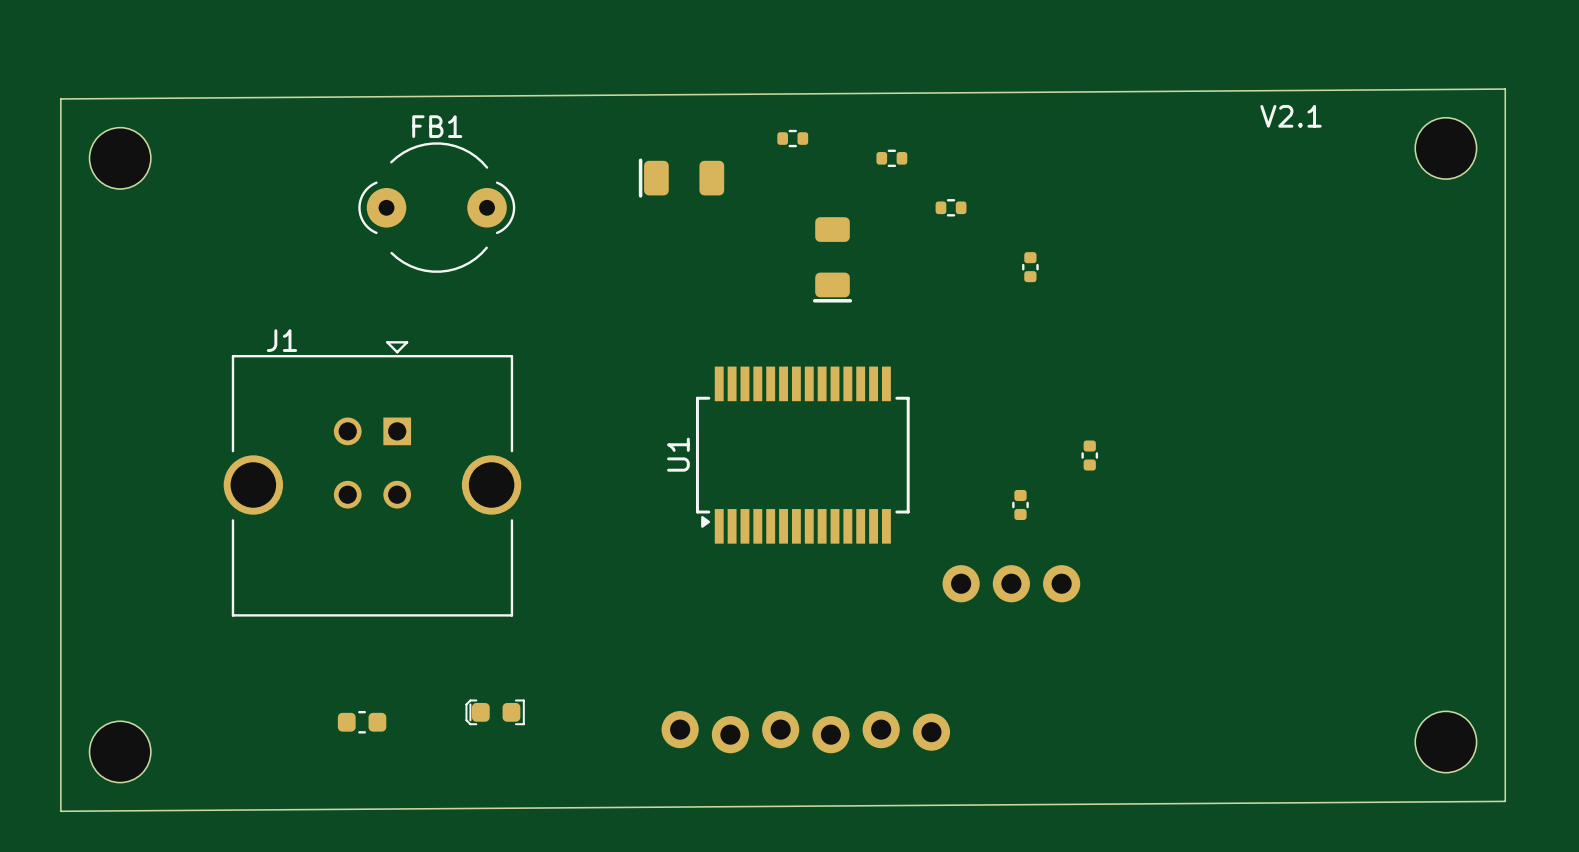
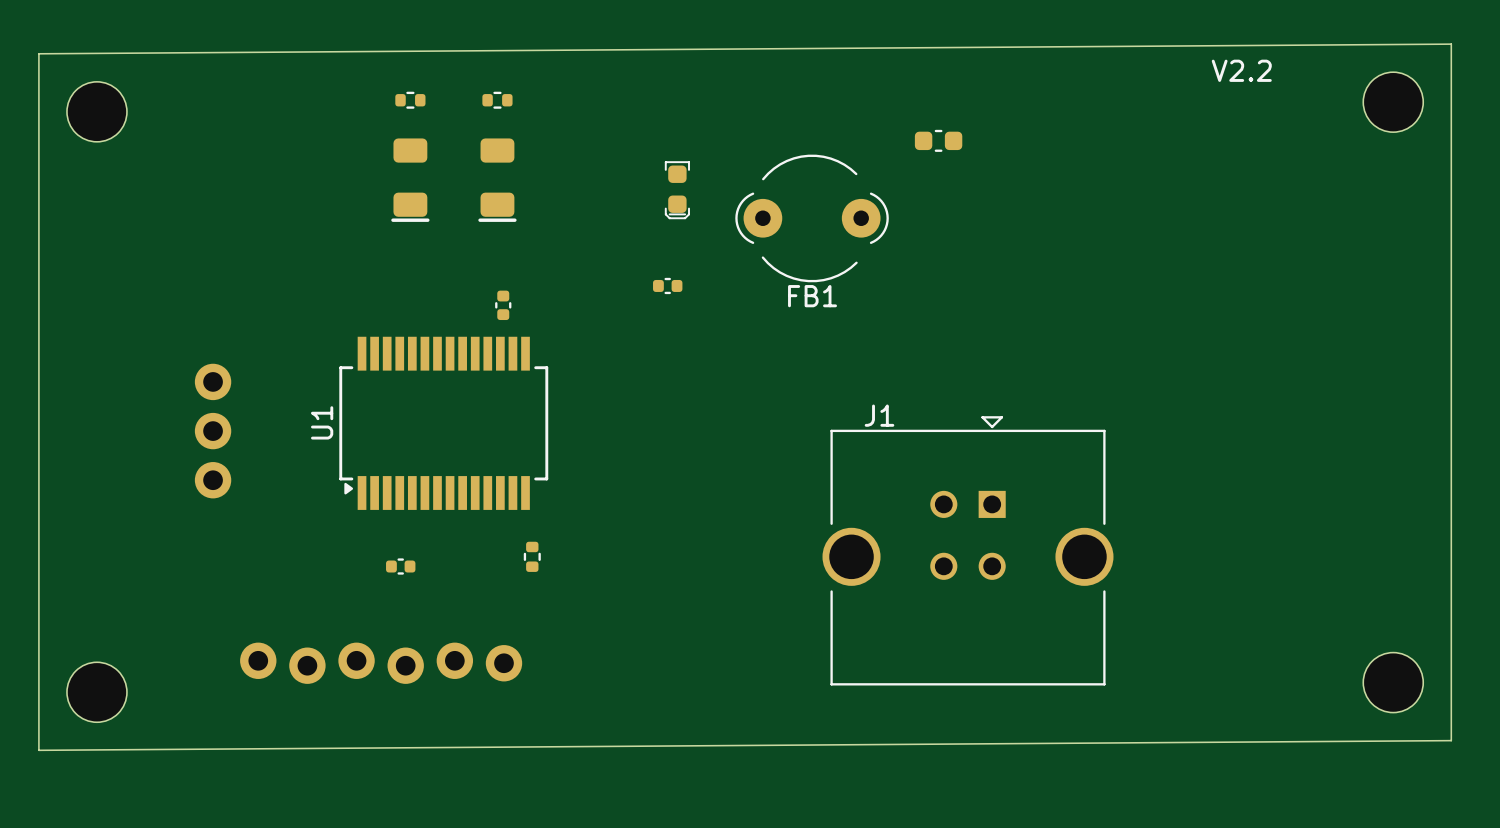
text: V2.1 (1290, 116) -> V2.2 (1241, 70)
part: (792, 138) -> none
part: none -> (410, 100)
part: none -> (497, 100)
part: (891, 158) -> none
part: (681, 178) -> none
part: none -> (938, 140)
FB1 rotation: 0° (436, 207) -> 180° (812, 218)
FB1 position: (436, 207) -> (812, 218)
part: (951, 207) -> none
part: none -> (410, 180)
part: none -> (497, 180)
part: none -> (677, 190)
part: (832, 259) -> none
part: (1030, 267) -> none
part: none -> (667, 285)
part: none -> (503, 305)
U1 position: (802, 455) -> (443, 423)
part: (1089, 455) -> none
J1 position: (372, 478) -> (967, 550)
part: none -> (213, 431)
part: (1020, 504) -> none
part: (1011, 583) -> none
part: none -> (532, 556)
part: none -> (400, 566)
part: (495, 712) -> none
part: (362, 722) -> none
part position: (805, 732) -> (381, 663)

